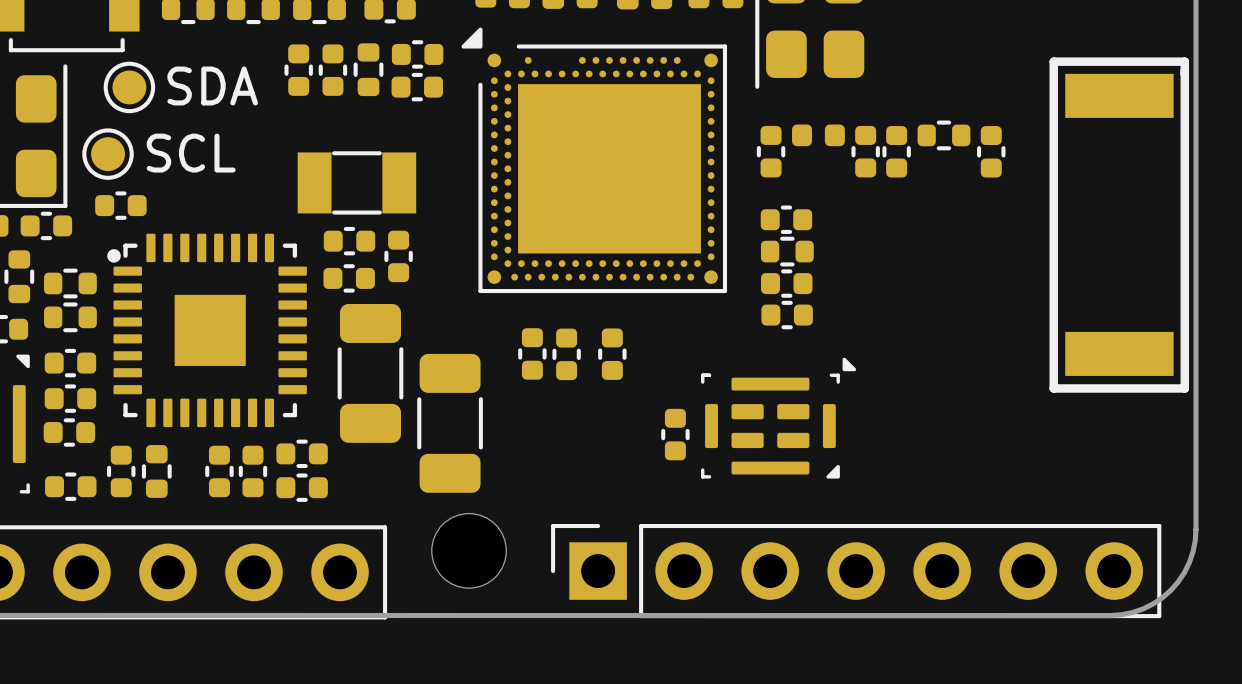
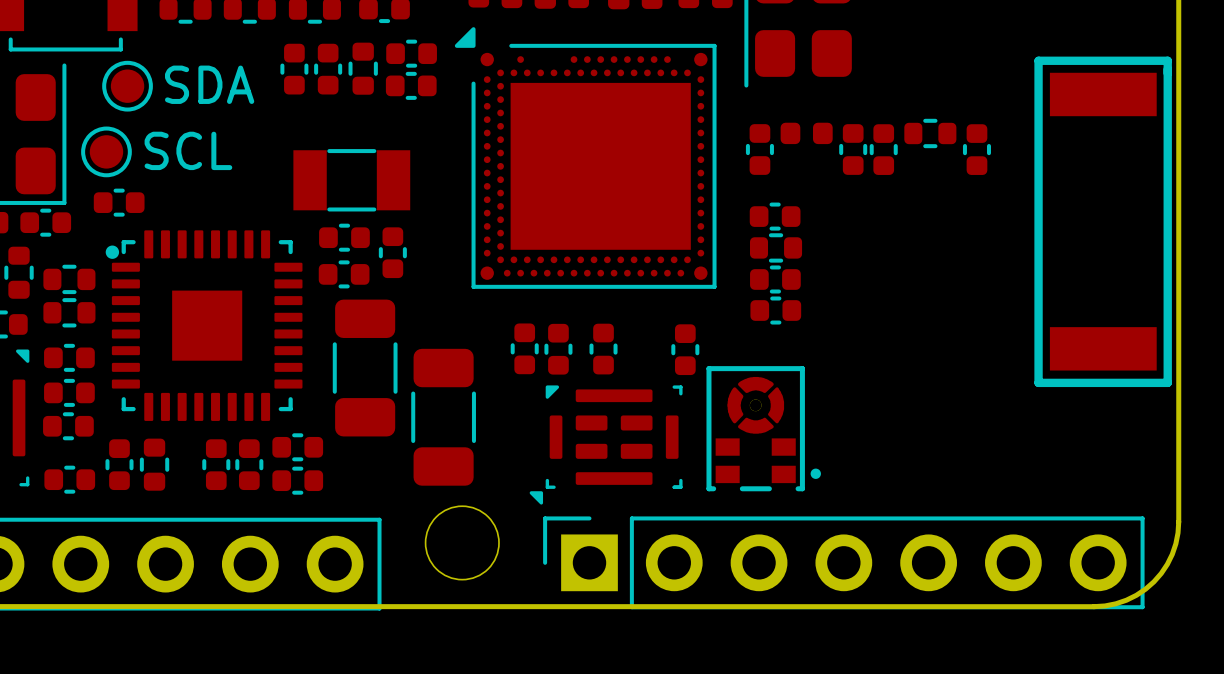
part footprint: [701, 357, 857, 479] -> [706, 366, 821, 492]
part position: (675, 434) -> (685, 349)
part: none -> (606, 444)

